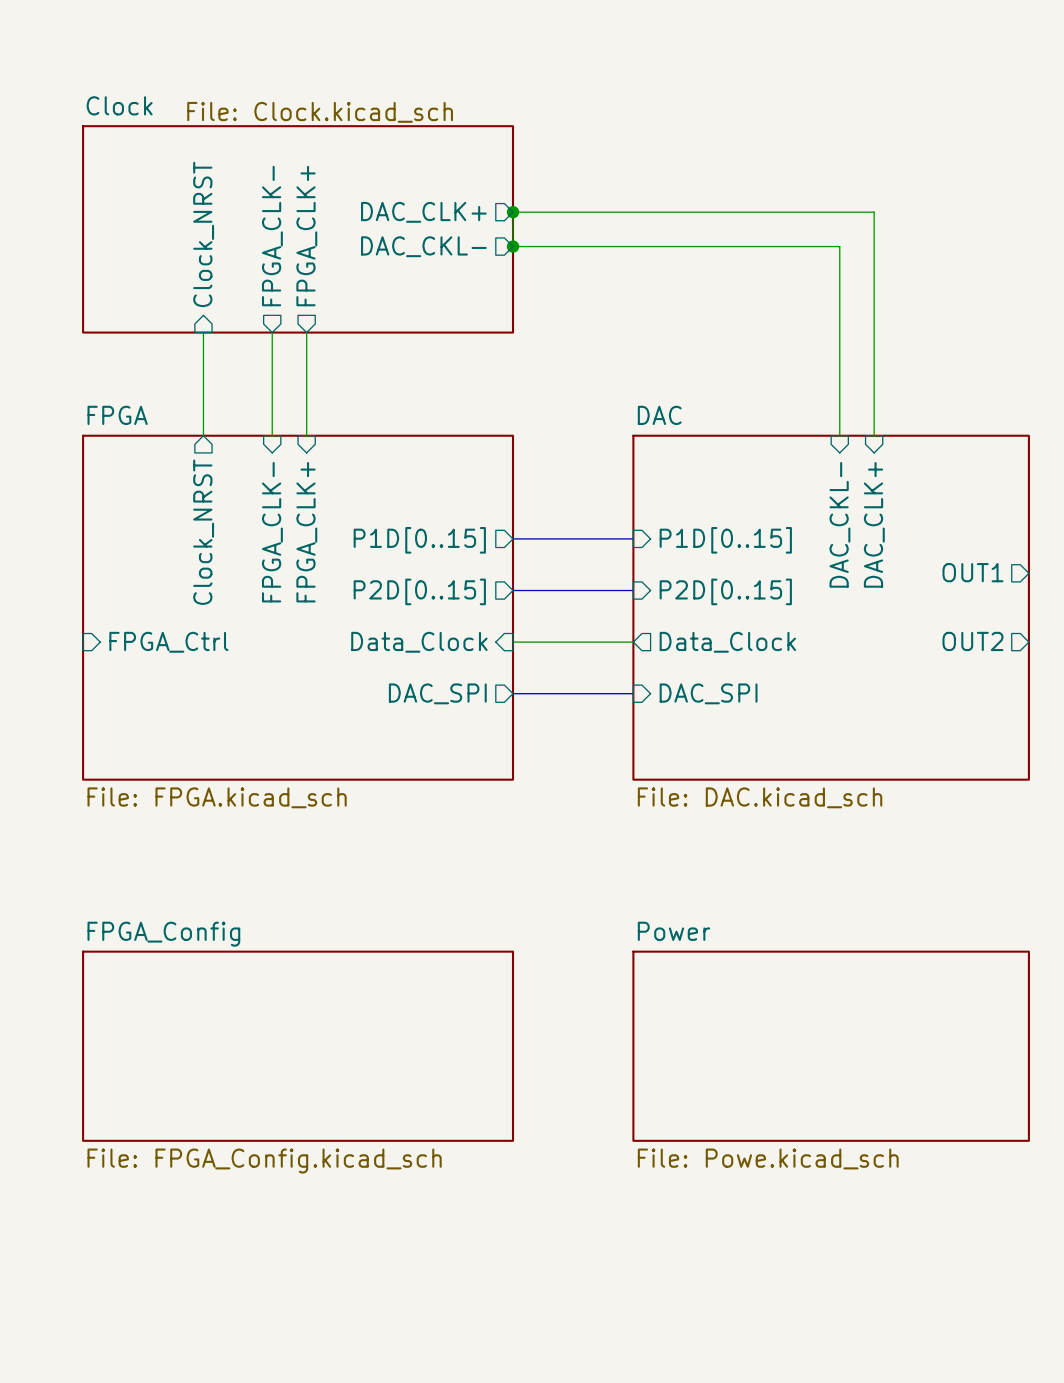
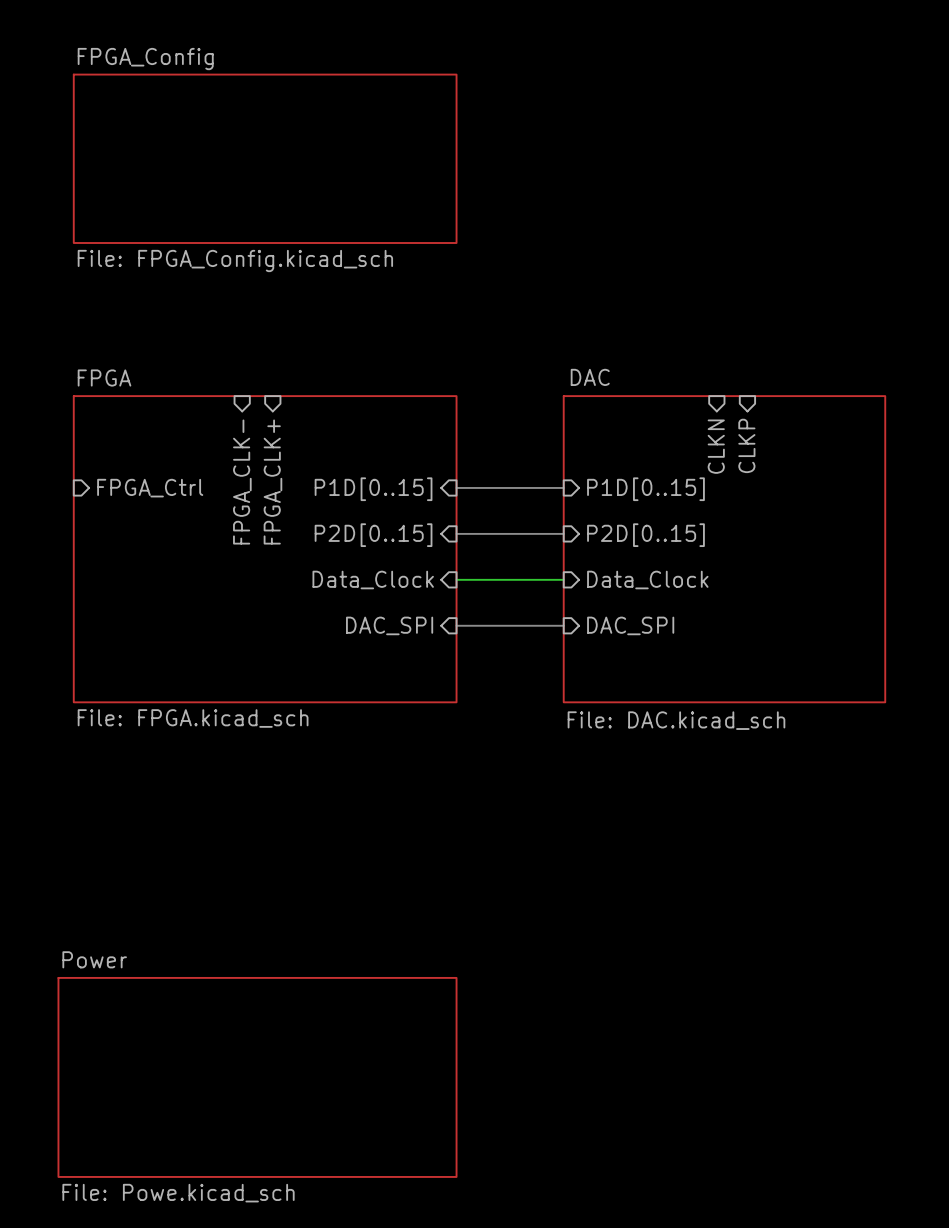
sheet FPGA_Config: none -> File: FPGA_Config.kicad_sch (265, 158)
sheet pin: DAC_CLK+ (423, 212) -> none
junction: (513, 212) -> none
sheet Clock: File: Clock.kicad_sch (298, 229) -> none
sheet pin: Clock_NRST (203, 234) -> none
sheet pin: FPGA_CLK- (272, 236) -> none
sheet pin: FPGA_CLK+ (306, 236) -> none
sheet pin: DAC_CKL- (423, 246) -> none
junction: (513, 246) -> none
wire: (203, 332) (203, 435) -> none
wire: (272, 332) (272, 435) -> none
wire: (306, 332) (306, 435) -> none
wire: (839, 435) (839, 246) (513, 246) (513, 212) (874, 212) (874, 435) -> none
sheet pin: none -> CLKN (716, 446)
sheet pin: DAC_CKL- (839, 524) -> CLKP (746, 445)
sheet pin: DAC_CLK+ (874, 524) -> none
sheet pin: Clock_NRST (203, 532) -> none
sheet pin shape: output (419, 540) -> input (373, 489)
sheet pin: OUT1 (972, 572) -> none
sheet pin shape: output (419, 591) -> input (373, 535)
sheet DAC: none -> File: DAC.kicad_sch (724, 549)
sheet DAC: File: DAC.kicad_sch (831, 607) -> none
sheet pin: OUT2 (972, 641) -> none
sheet pin position: FPGA_Ctrl (168, 642) -> FPGA_Ctrl (150, 488)
sheet pin shape: output (727, 642) -> input (647, 579)
sheet pin shape: output (437, 693) -> input (389, 625)
sheet FPGA_Config: File: FPGA_Config.kicad_sch (298, 1046) -> none
sheet Power: File: Powe.kicad_sch (831, 1046) -> none
sheet Power: none -> File: Powe.kicad_sch (257, 1077)

